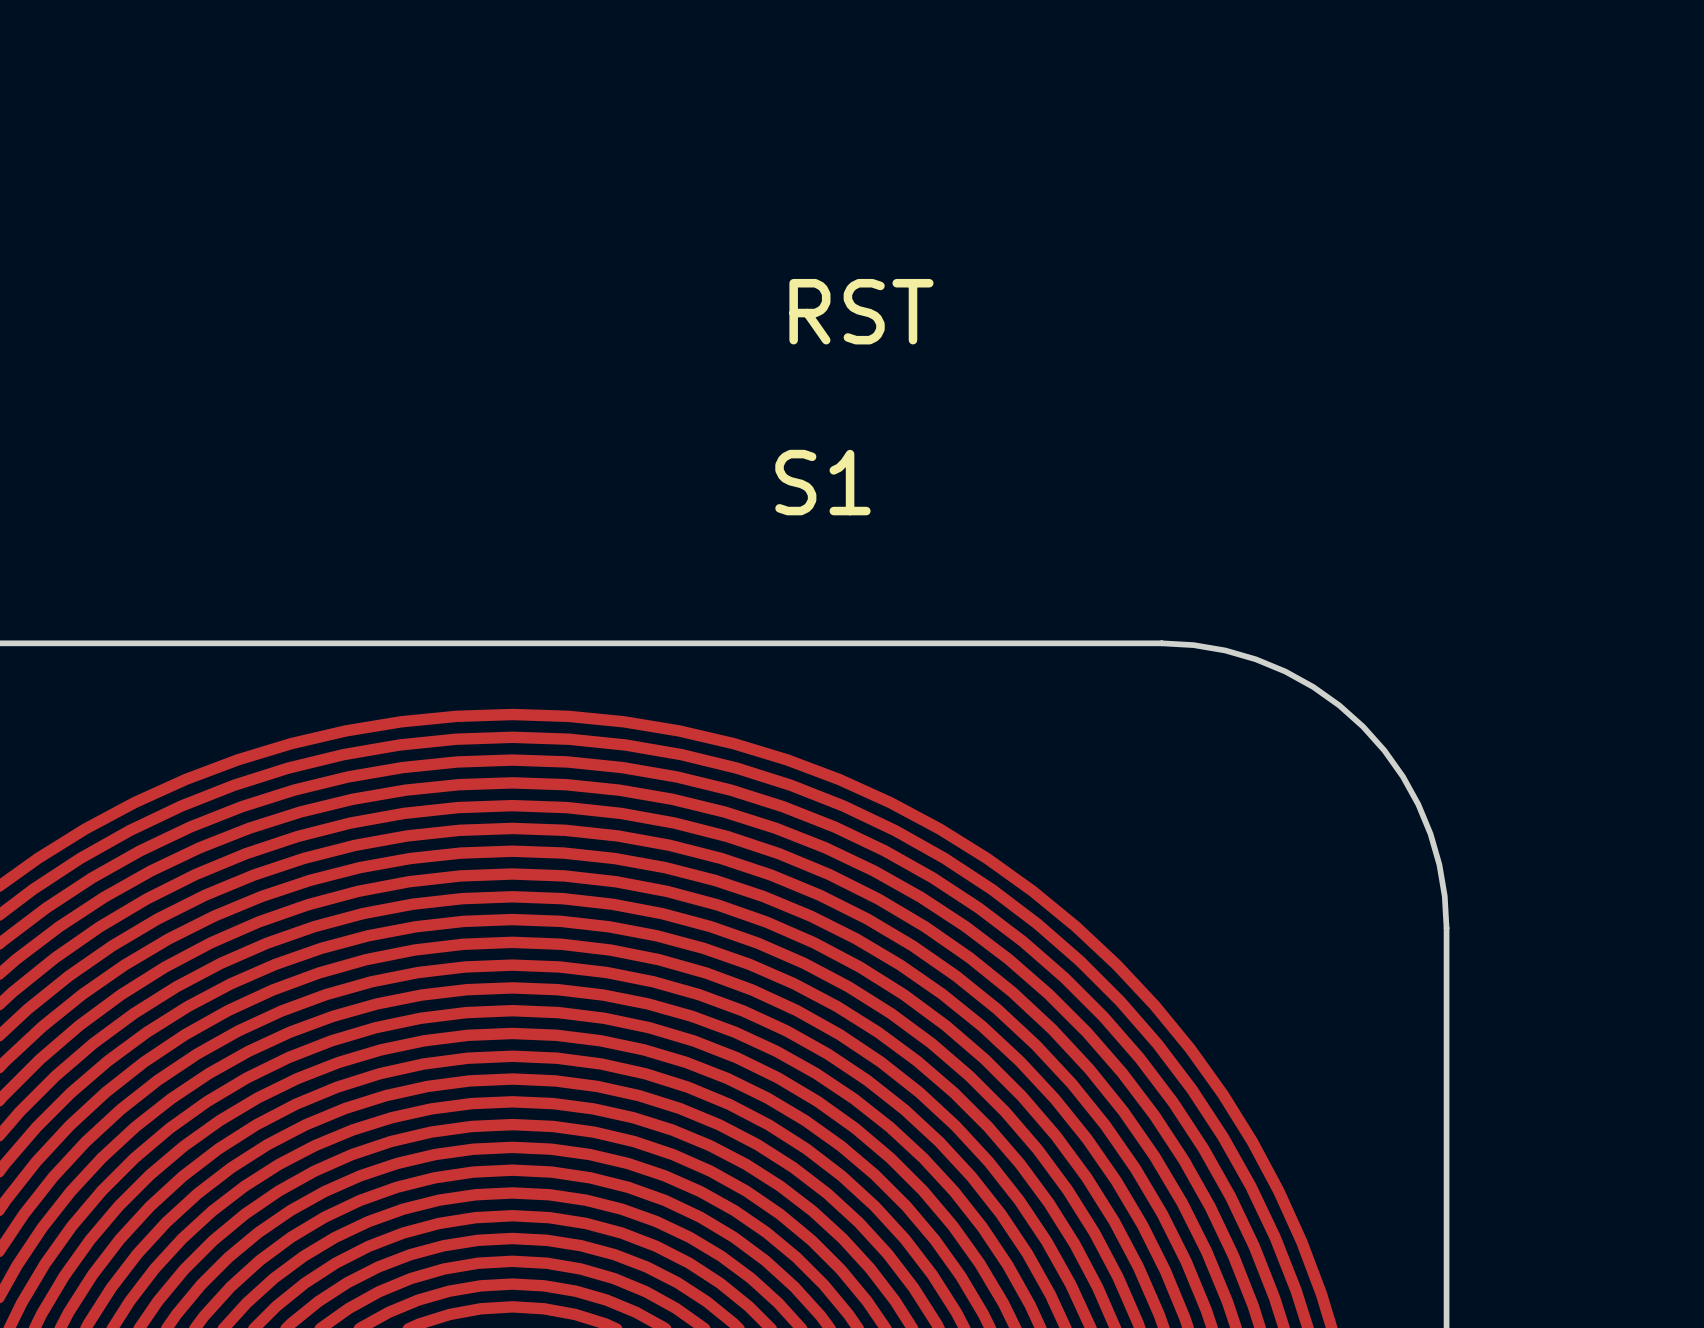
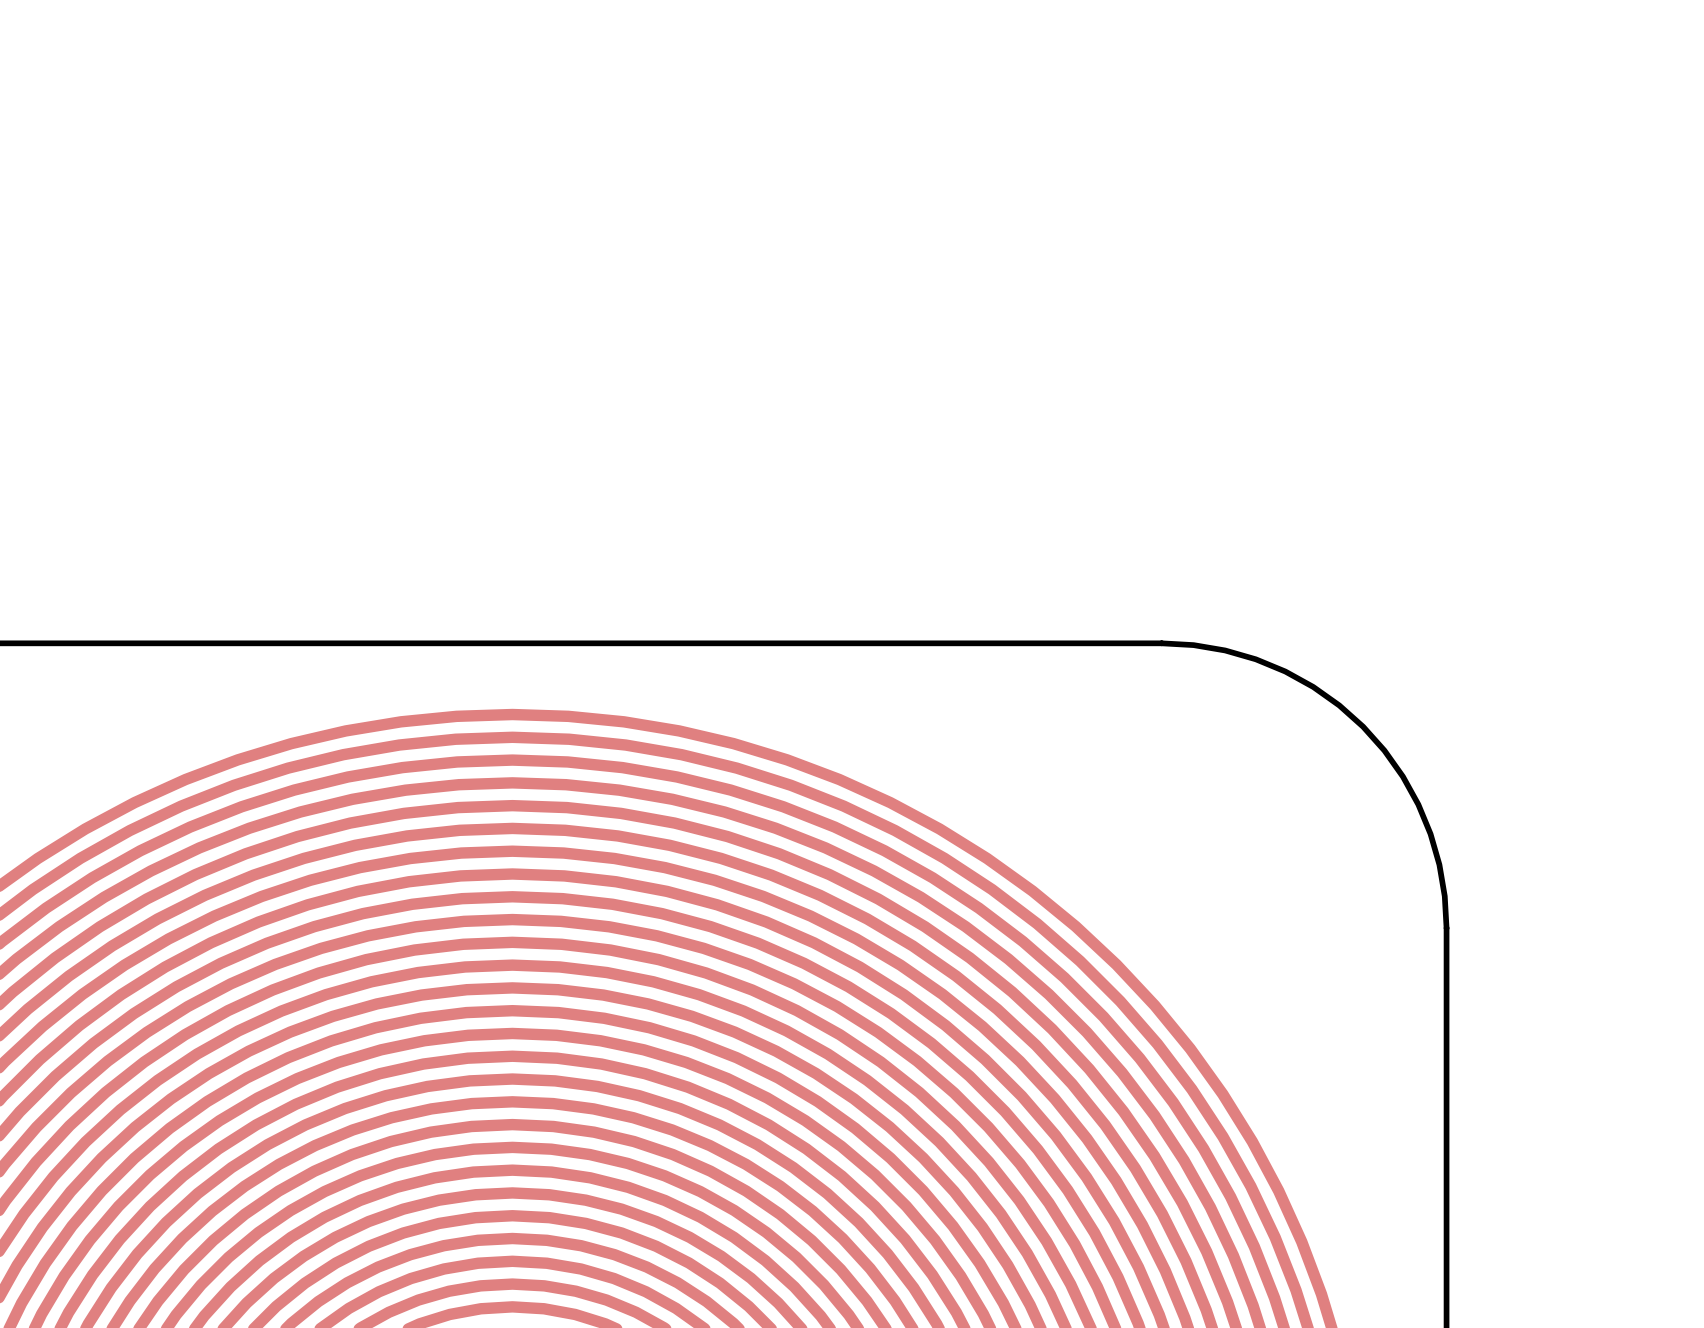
text: RST (861, 311) -> none
text: S1 (822, 482) -> none

